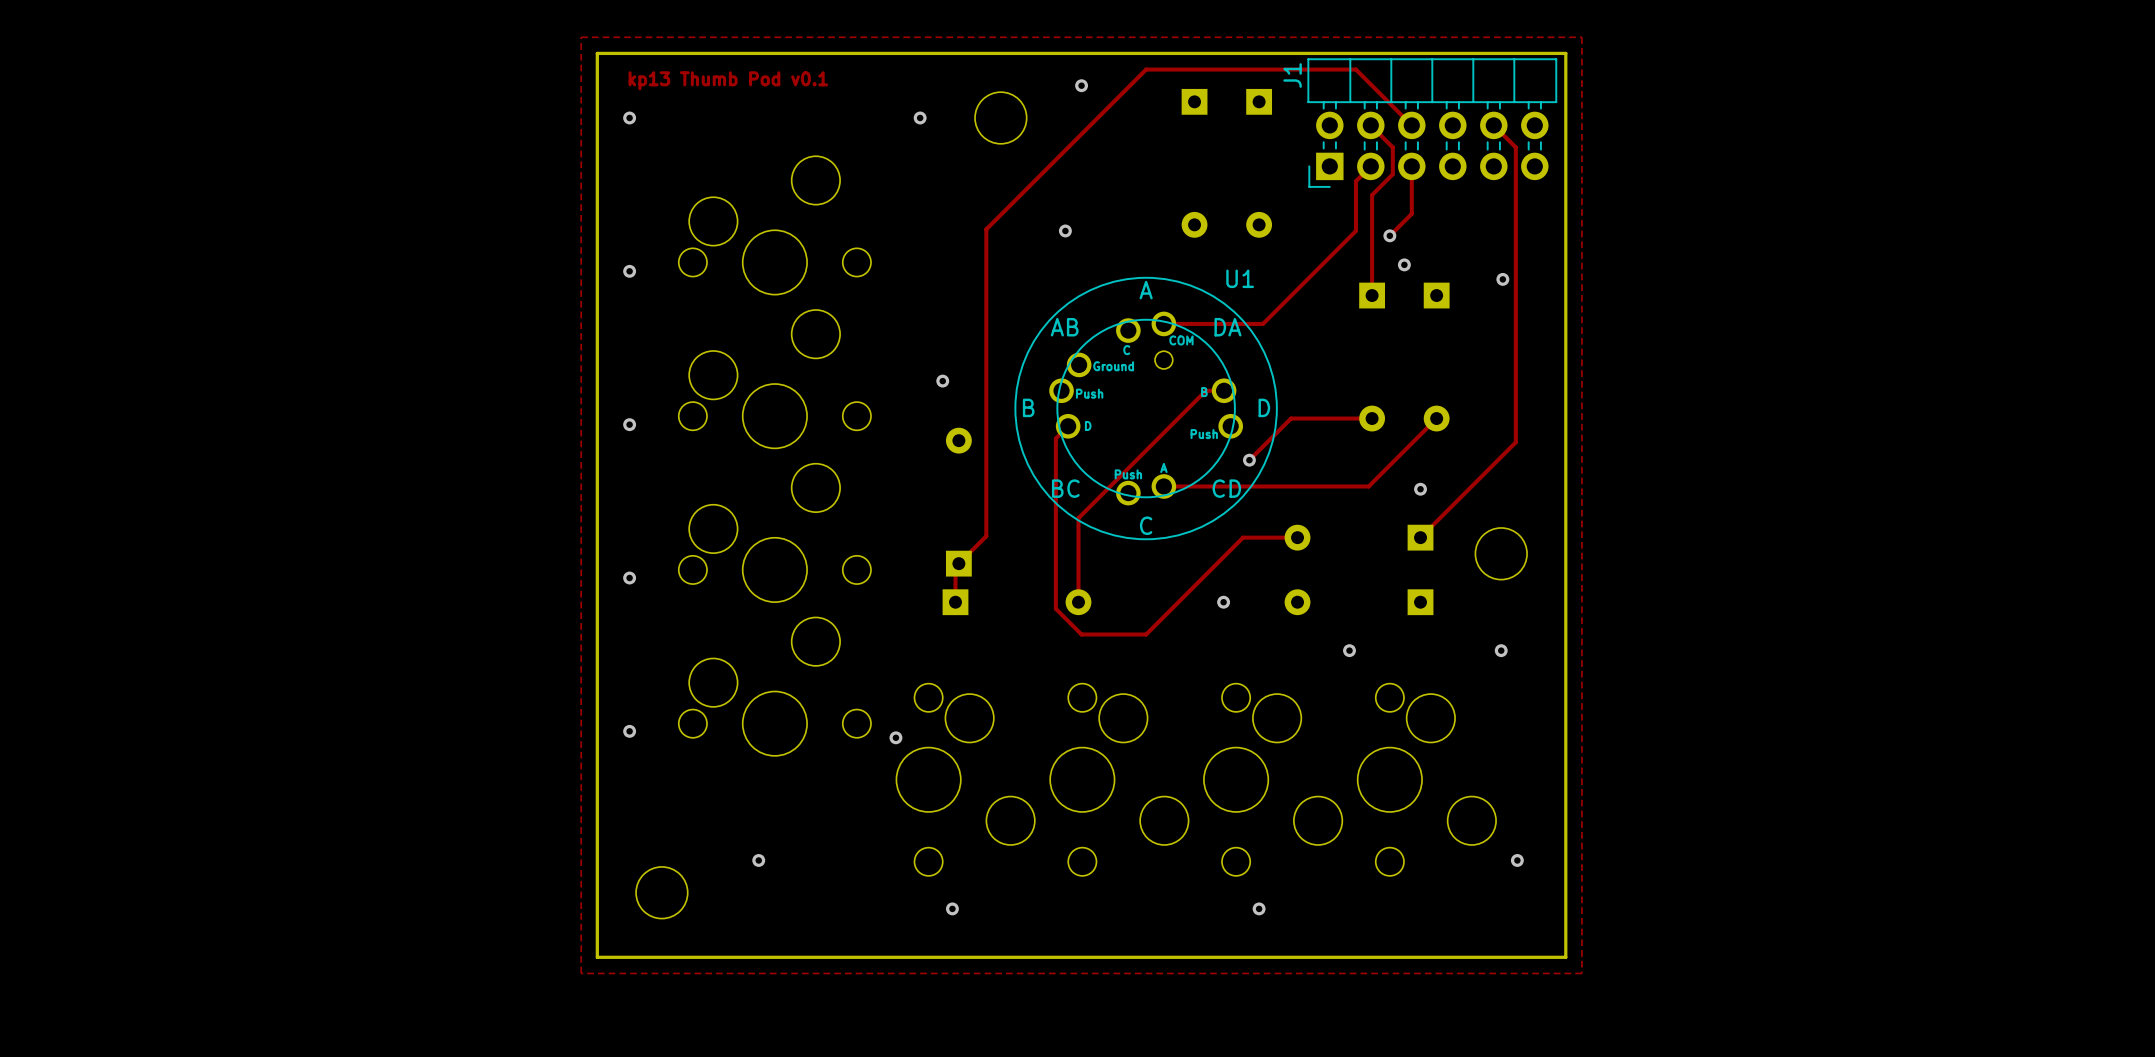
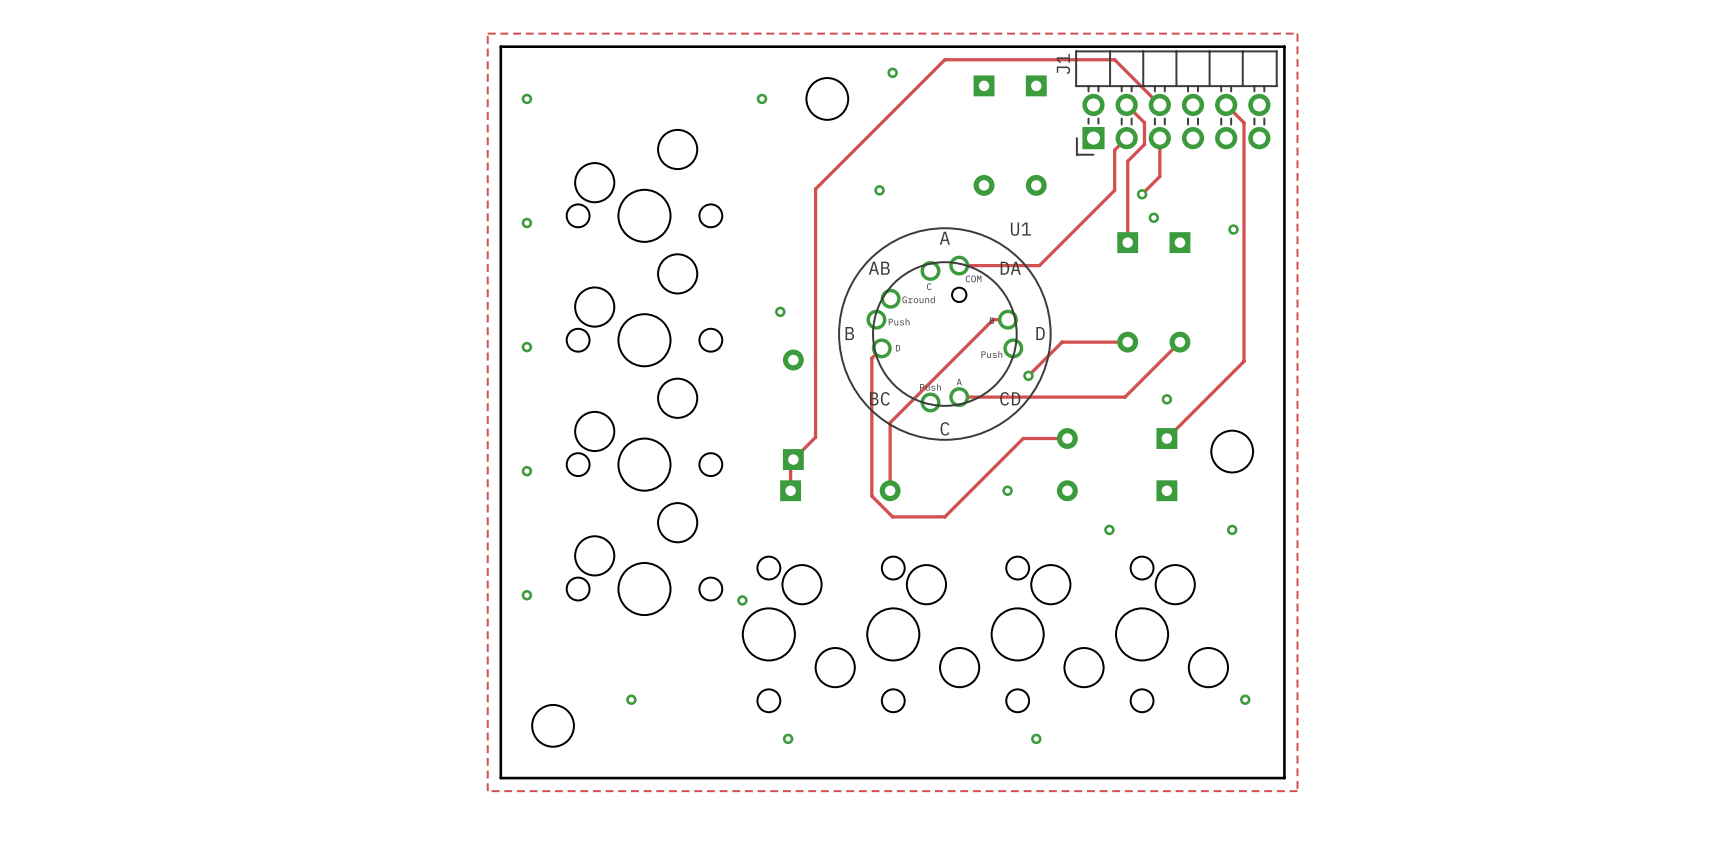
text: kp13 Thumb Pod v0.1 (728, 80) -> none

